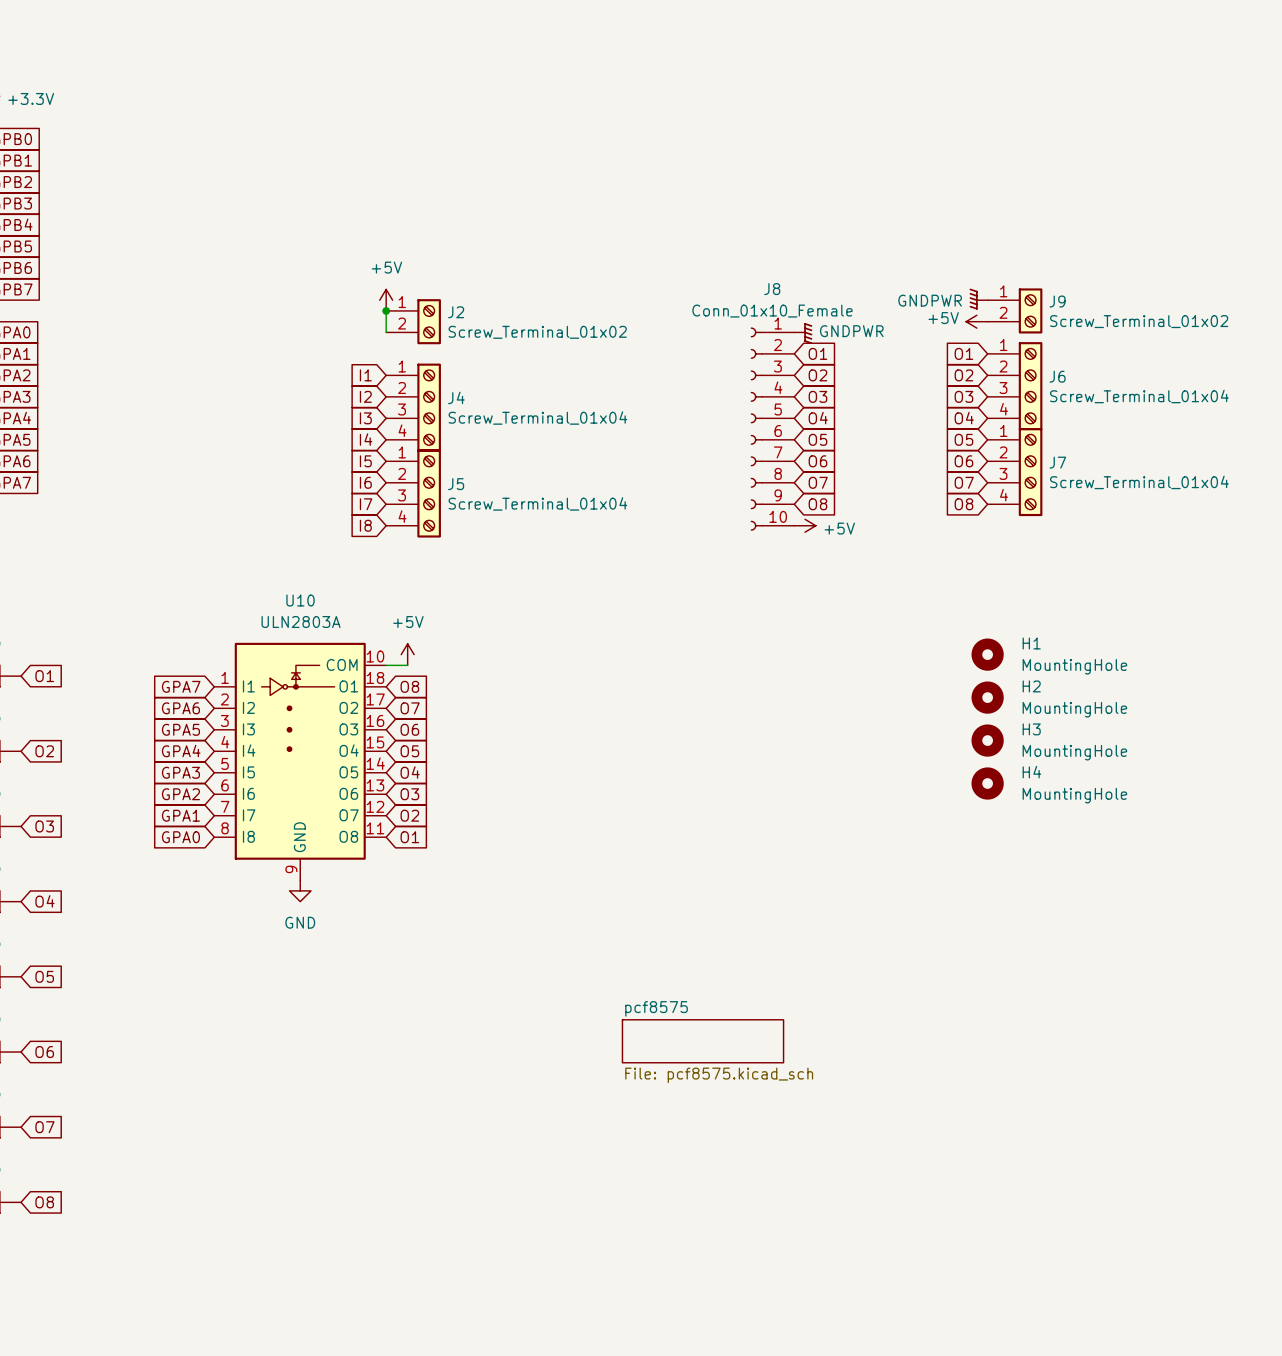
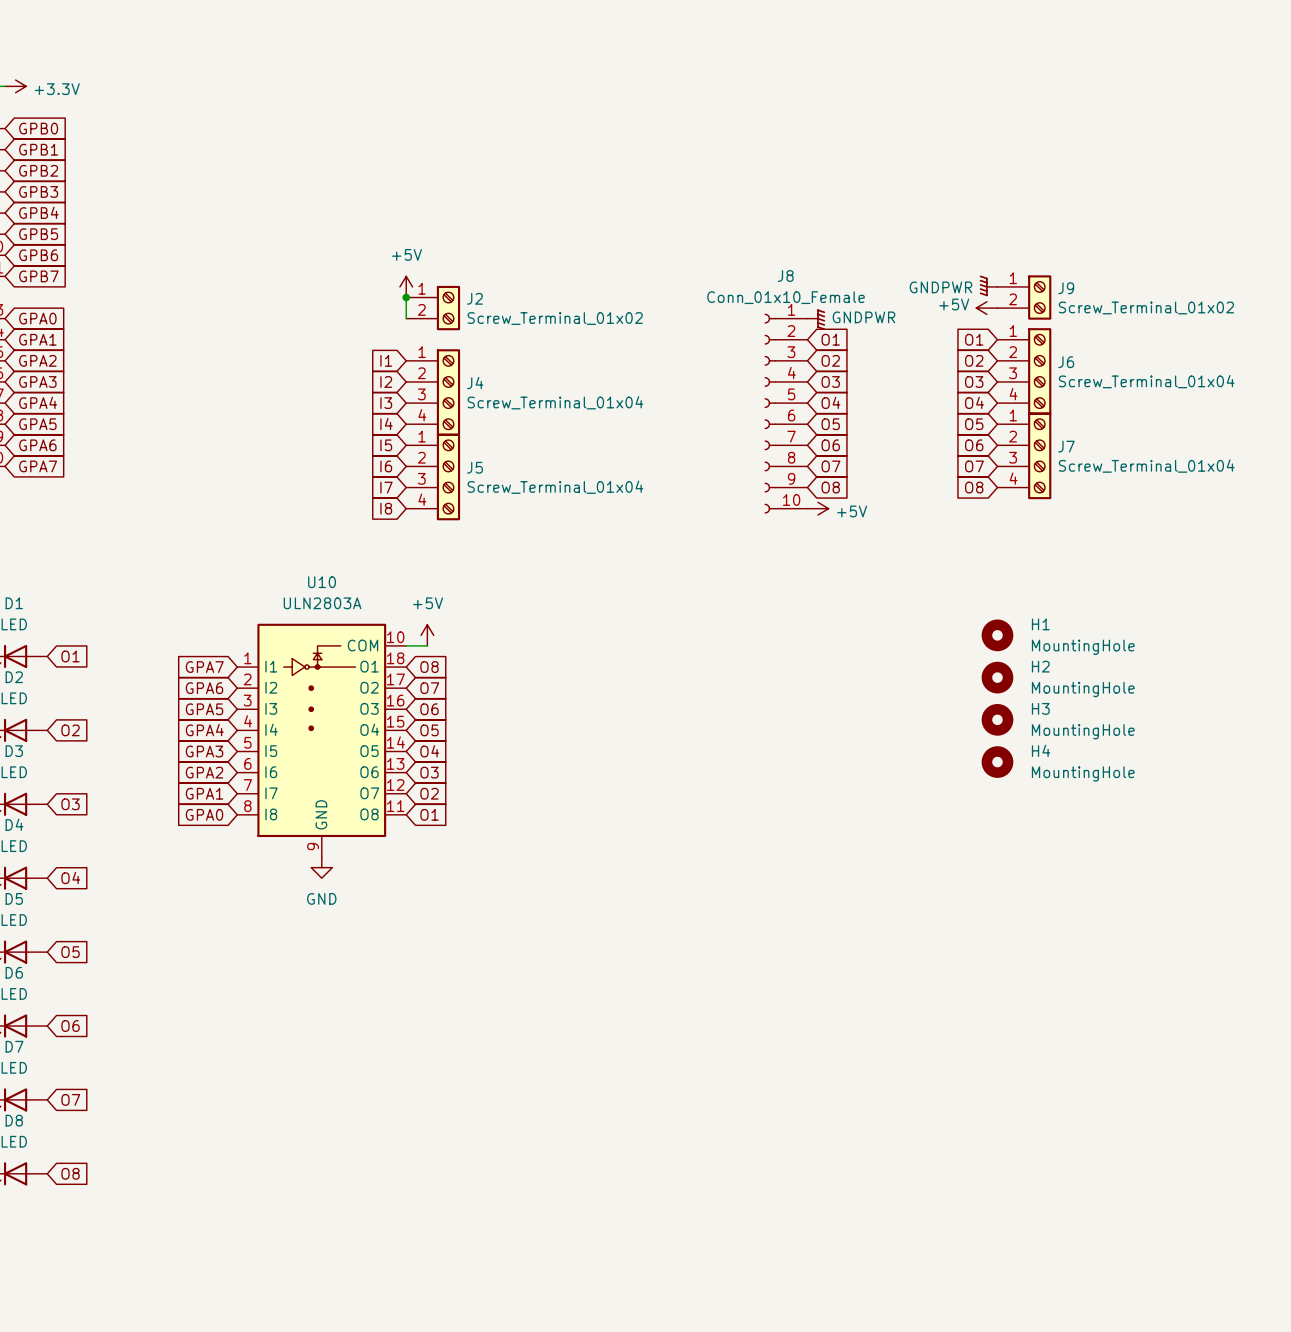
sheet pcf8575: File: pcf8575.kicad_sch (703, 1041) -> none

